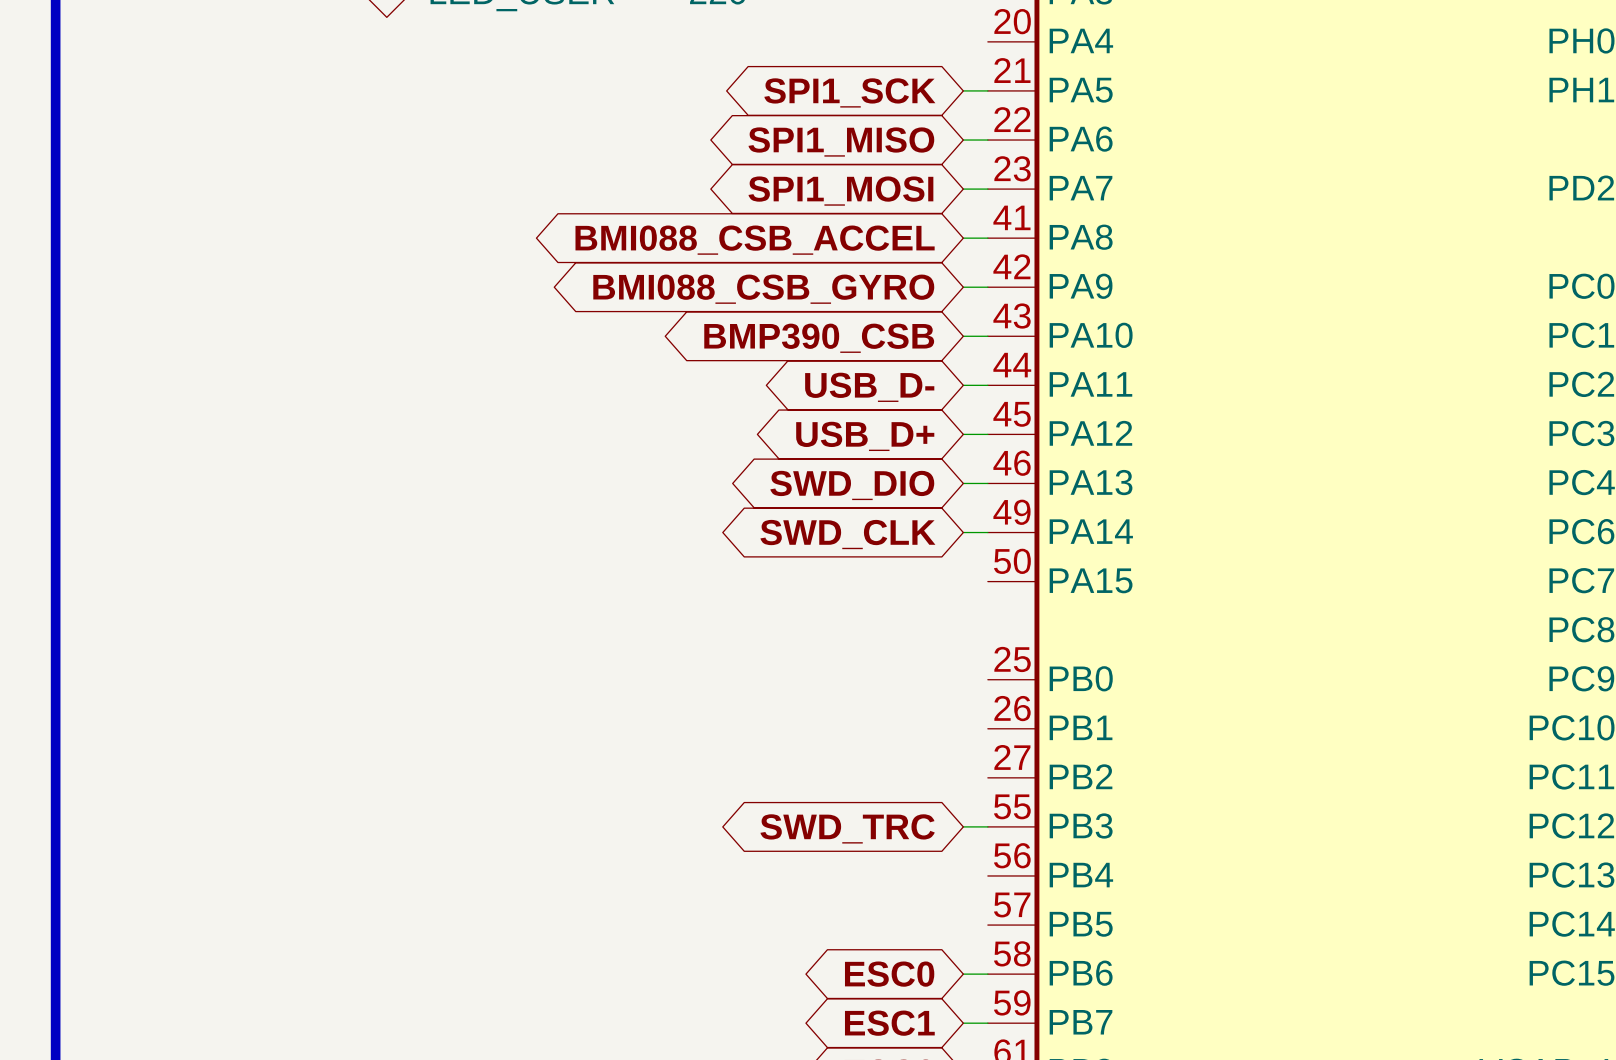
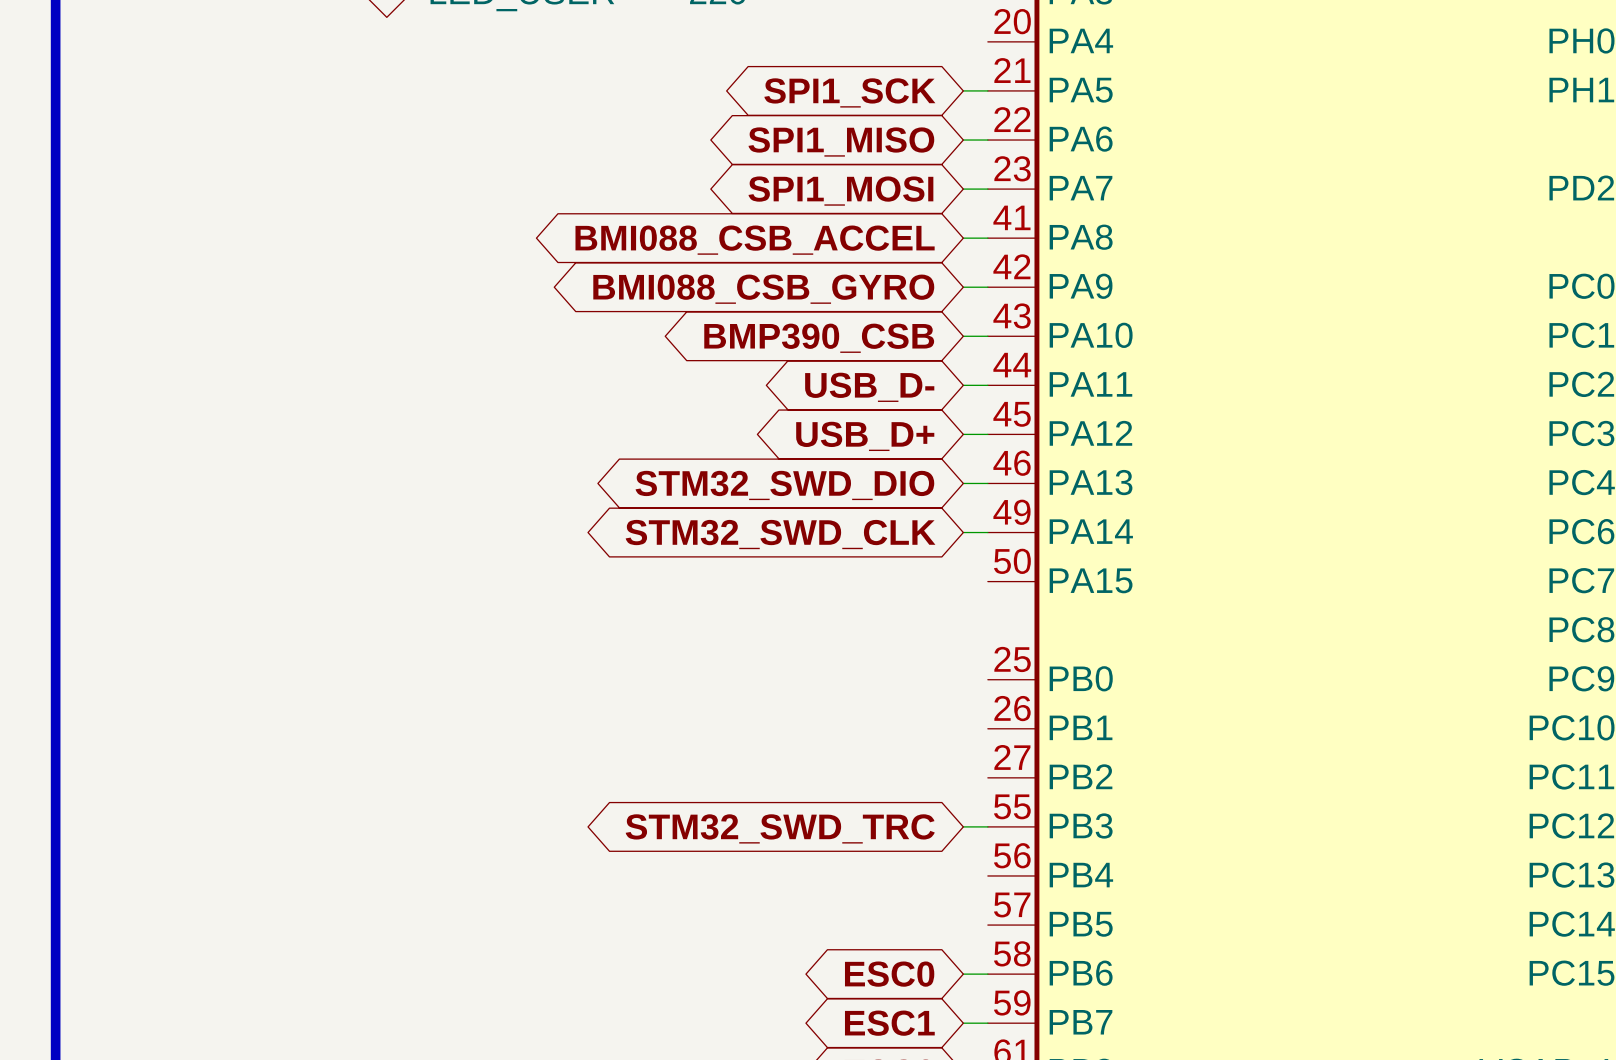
global label: SWD_DIO (852, 485) -> STM32_SWD_DIO (784, 485)
global label: SWD_CLK (847, 534) -> STM32_SWD_CLK (780, 534)
global label: SWD_TRC (847, 828) -> STM32_SWD_TRC (780, 828)

